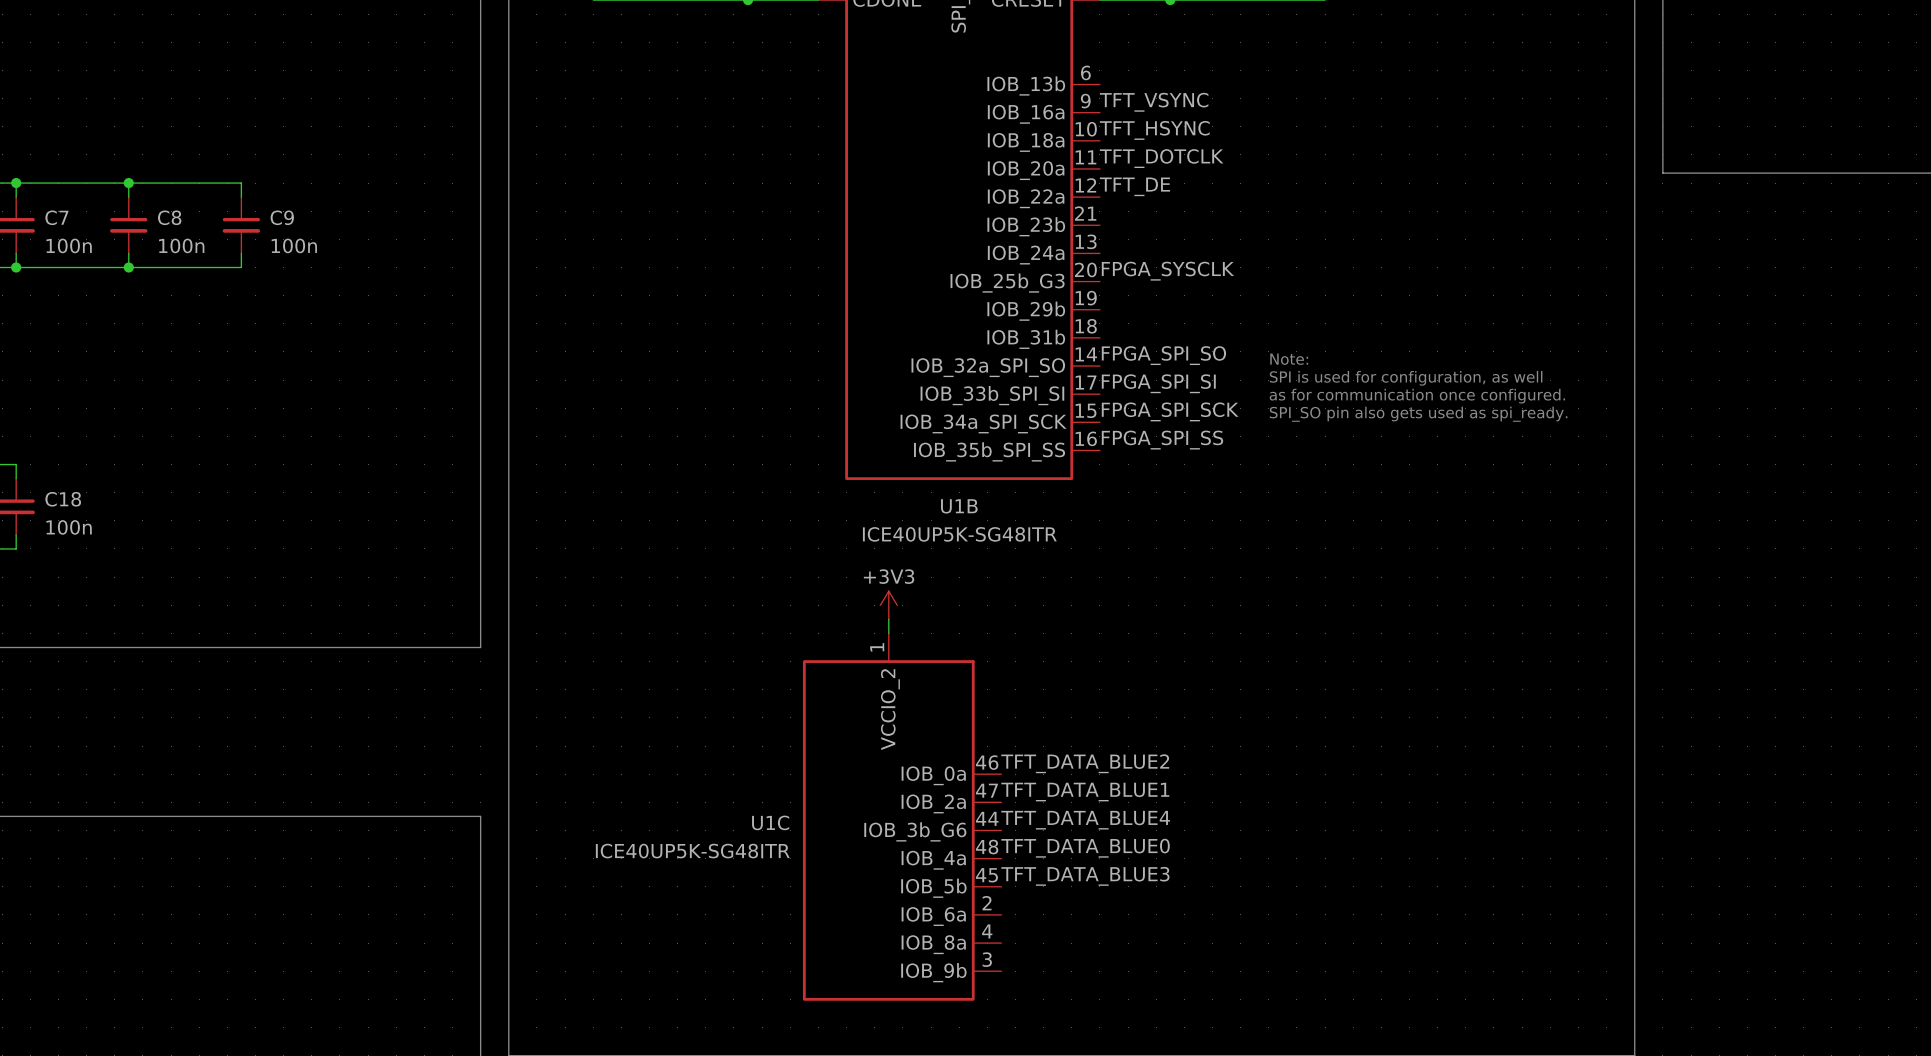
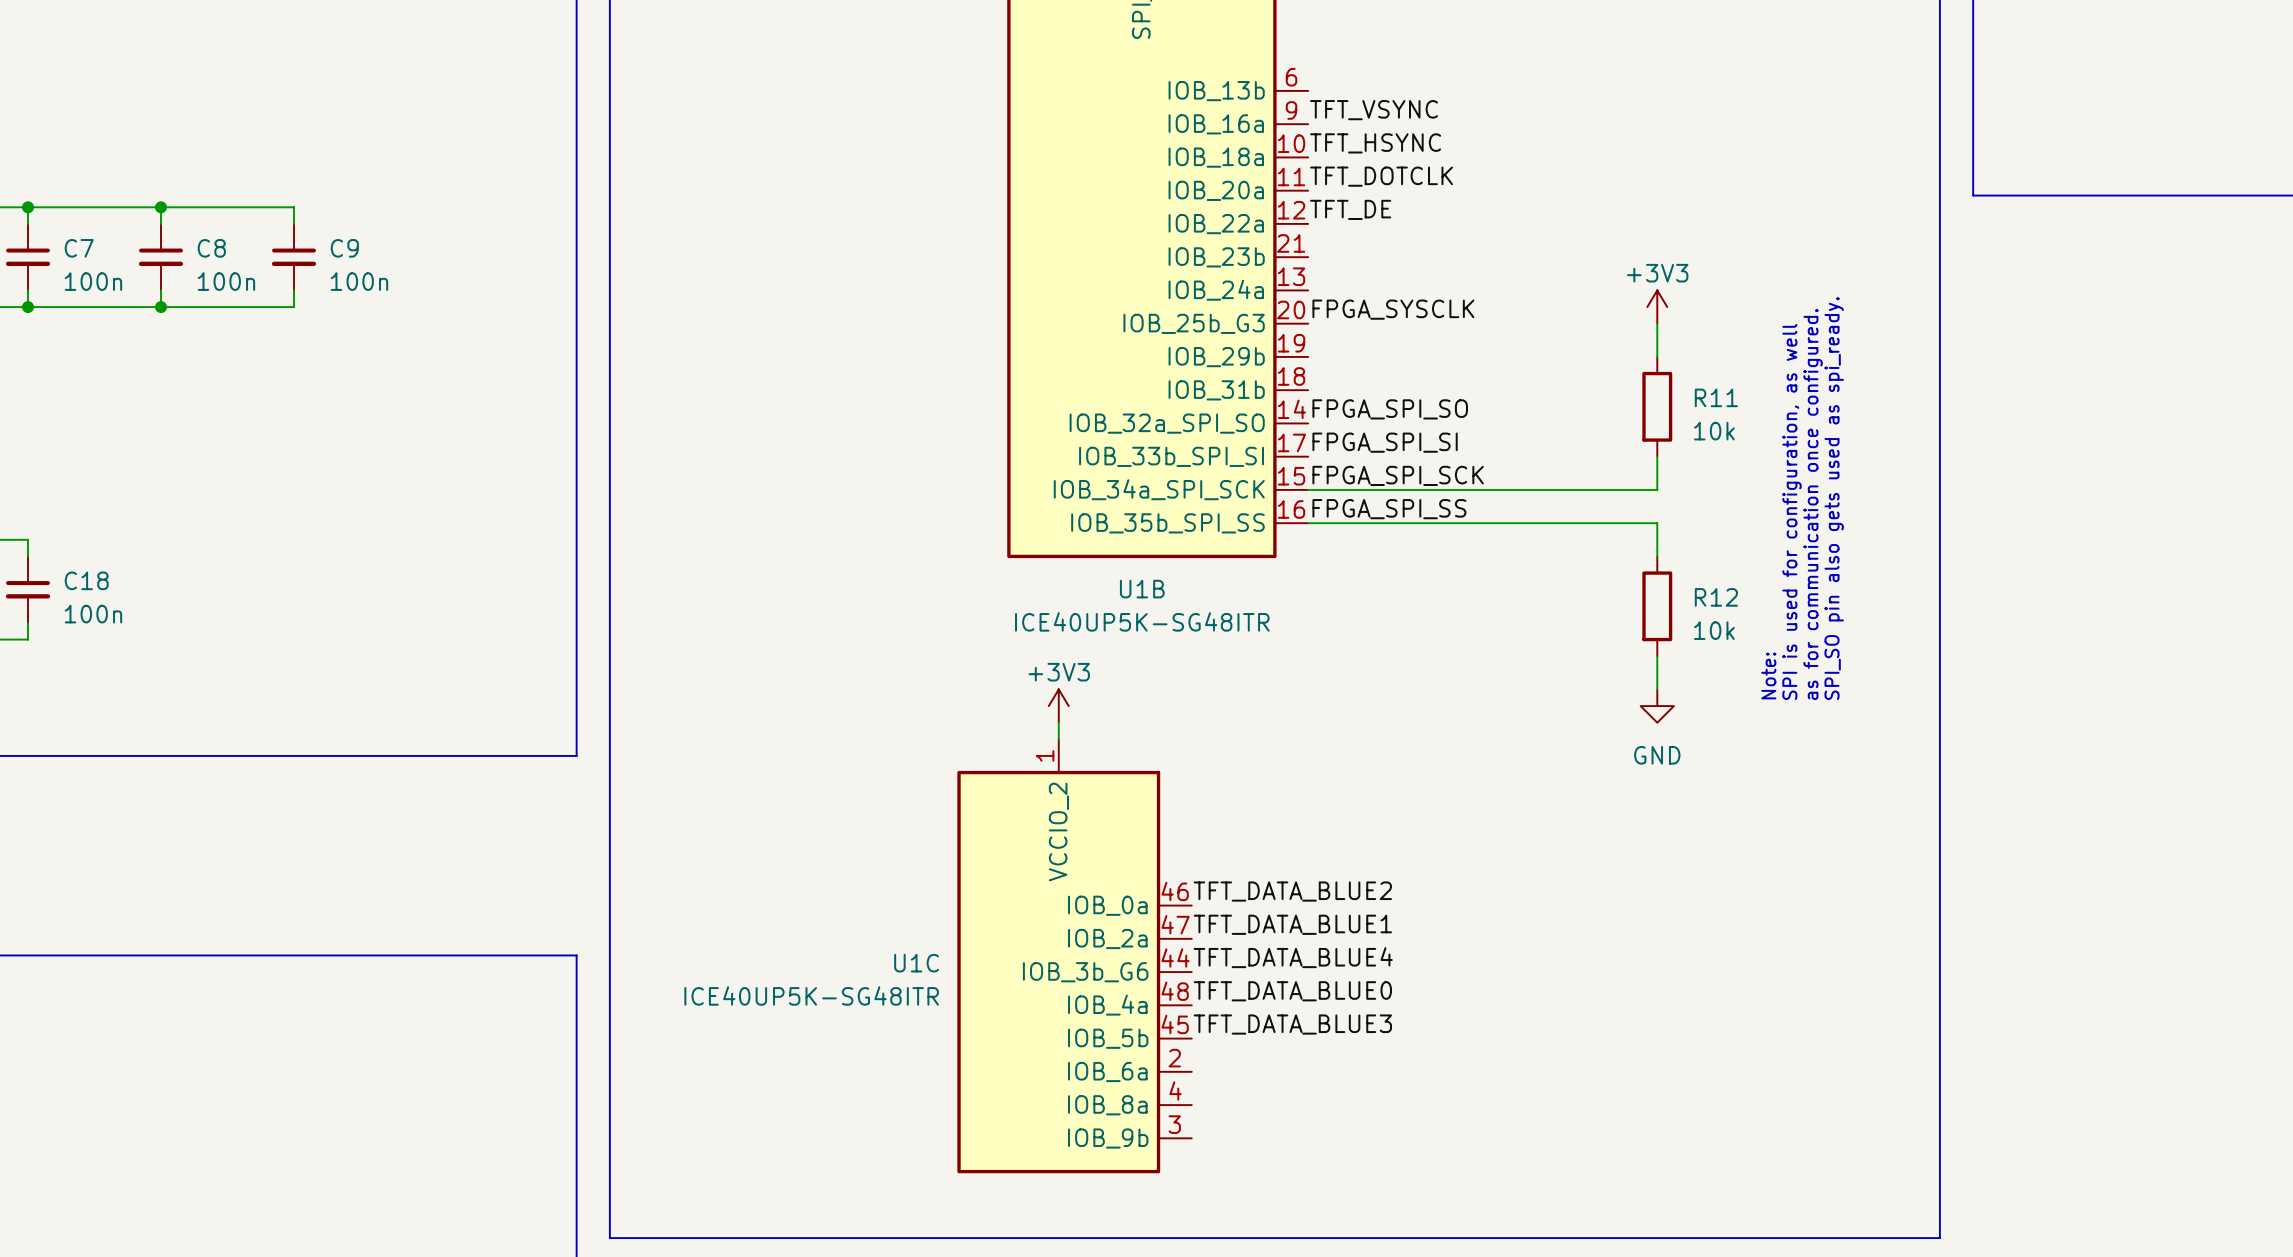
power symbol: none -> +3V3 (1657, 307)
wire: none -> (1657, 323) (1657, 356)
R11: none -> 10k (1657, 406)
text: Note: (1289, 359) -> none
text: SPI is used for configuration, as well (1406, 378) -> none
wire: none -> (1657, 456) (1657, 489) (1308, 489)
text: as for communication once configured. (1417, 396) -> none
text: SPI_SO pin also gets used as spi_ready. (1418, 414) -> none
wire: none -> (1308, 523) (1657, 523) (1657, 556)
text: none -> SPI_SO pin also gets used as spi_ready. (1834, 498)
text: none -> as for communication once configured. (1813, 504)
text: none -> SPI is used for configuration, as well (1792, 511)
R12: none -> 10k (1657, 606)
wire: none -> (1657, 656) (1657, 689)
text: none -> Note: (1768, 675)
power symbol: none -> GND (1657, 706)

